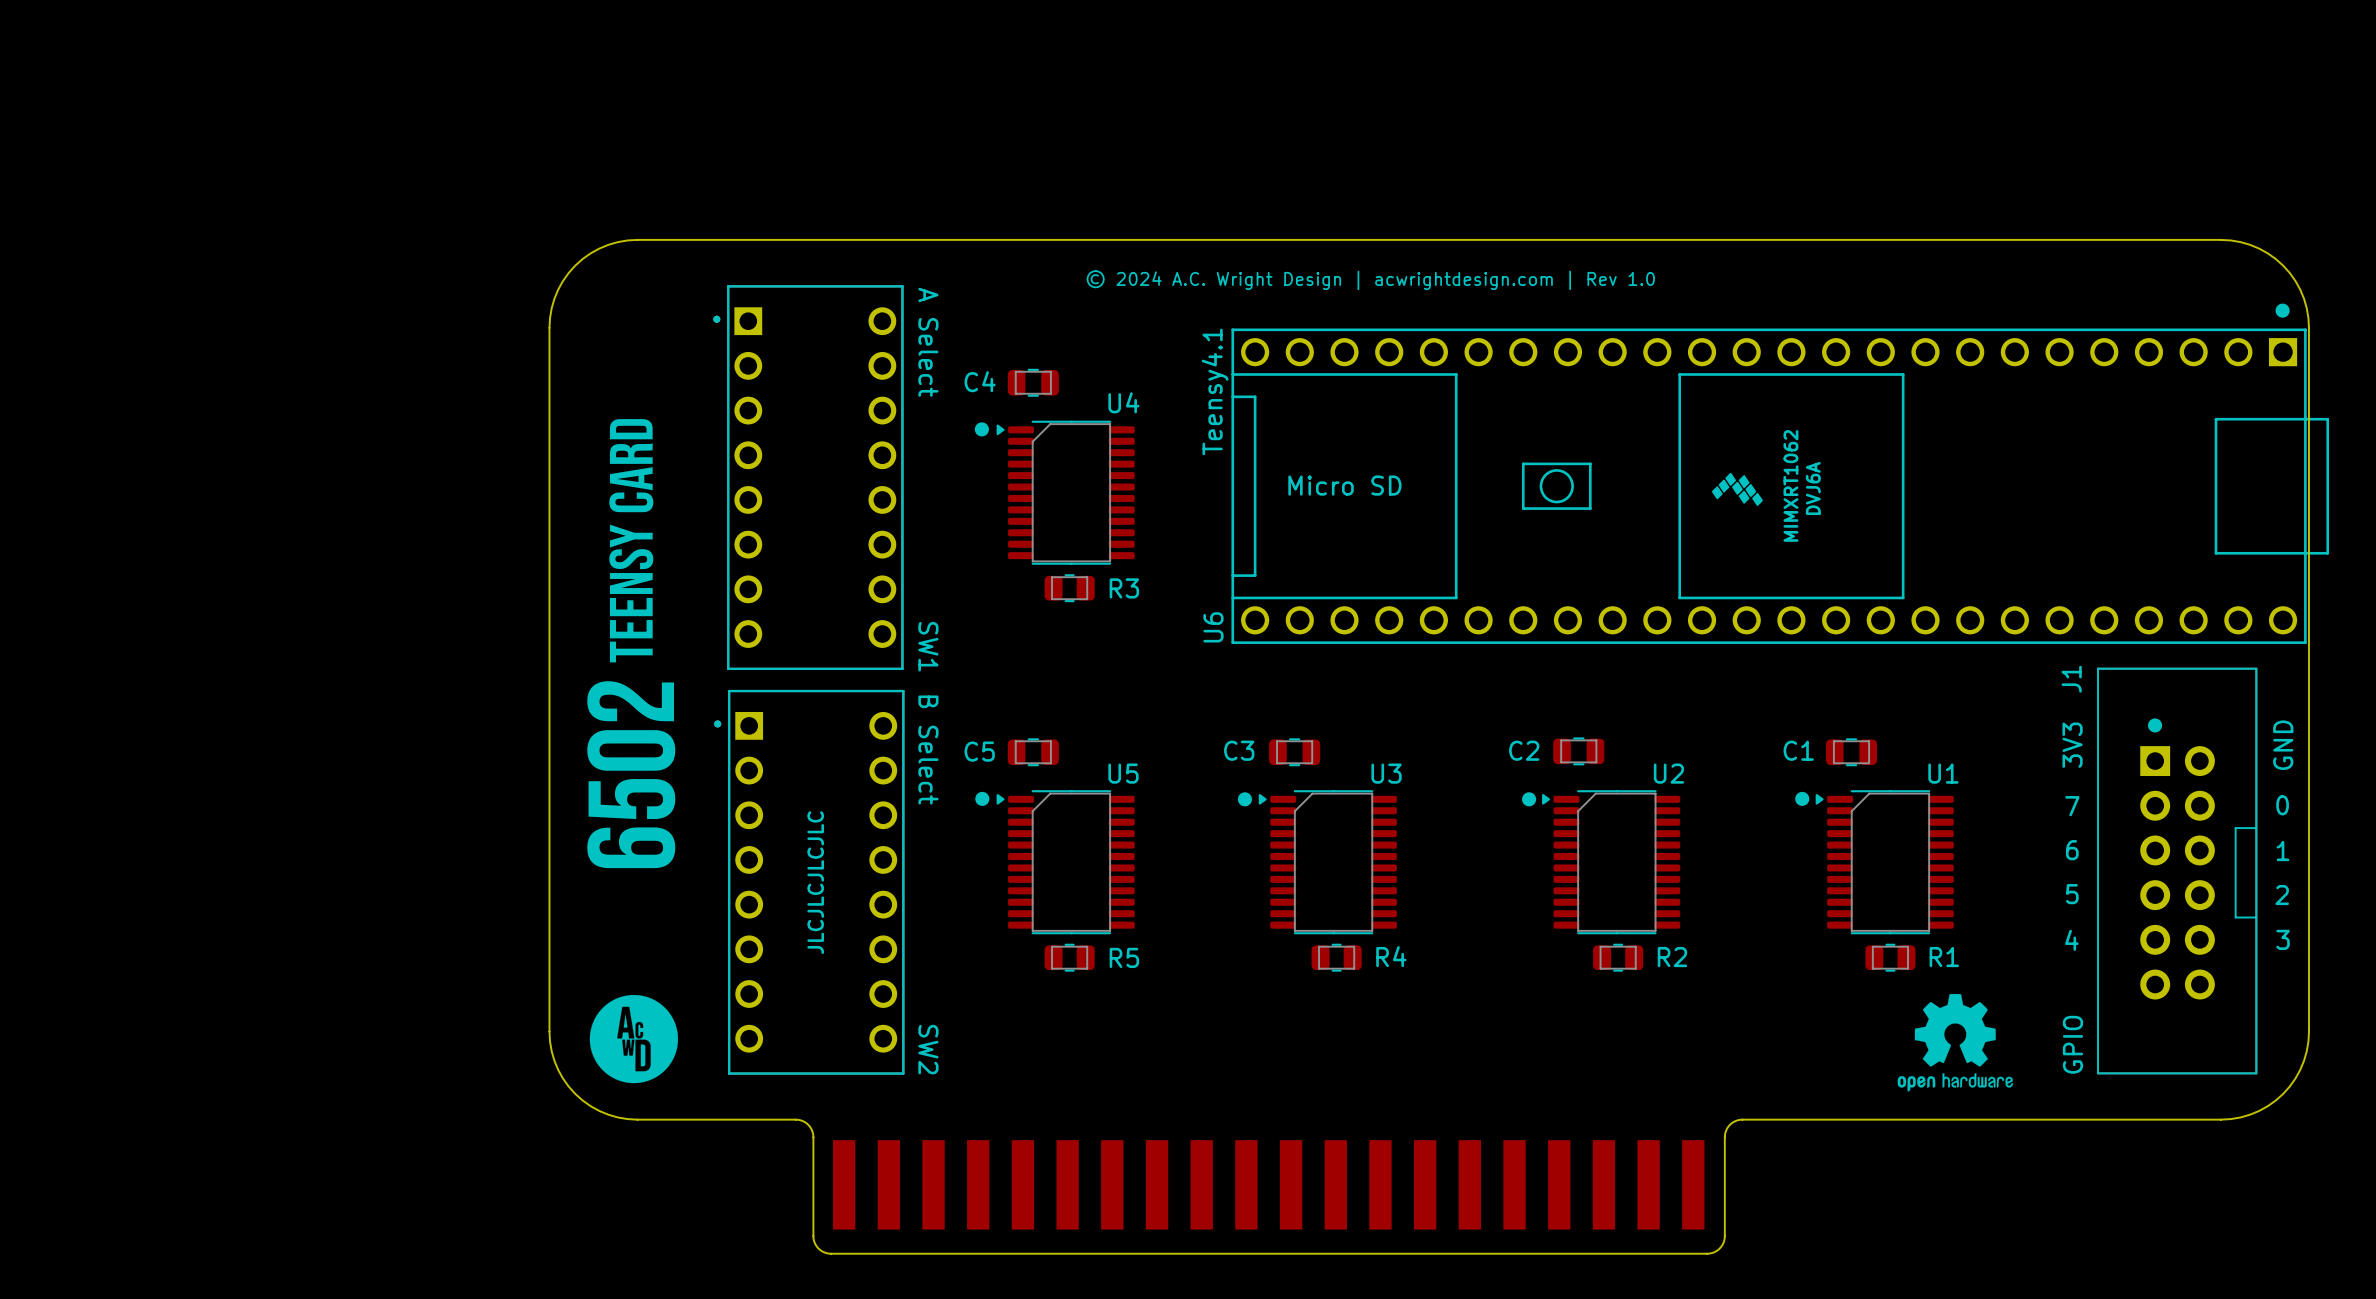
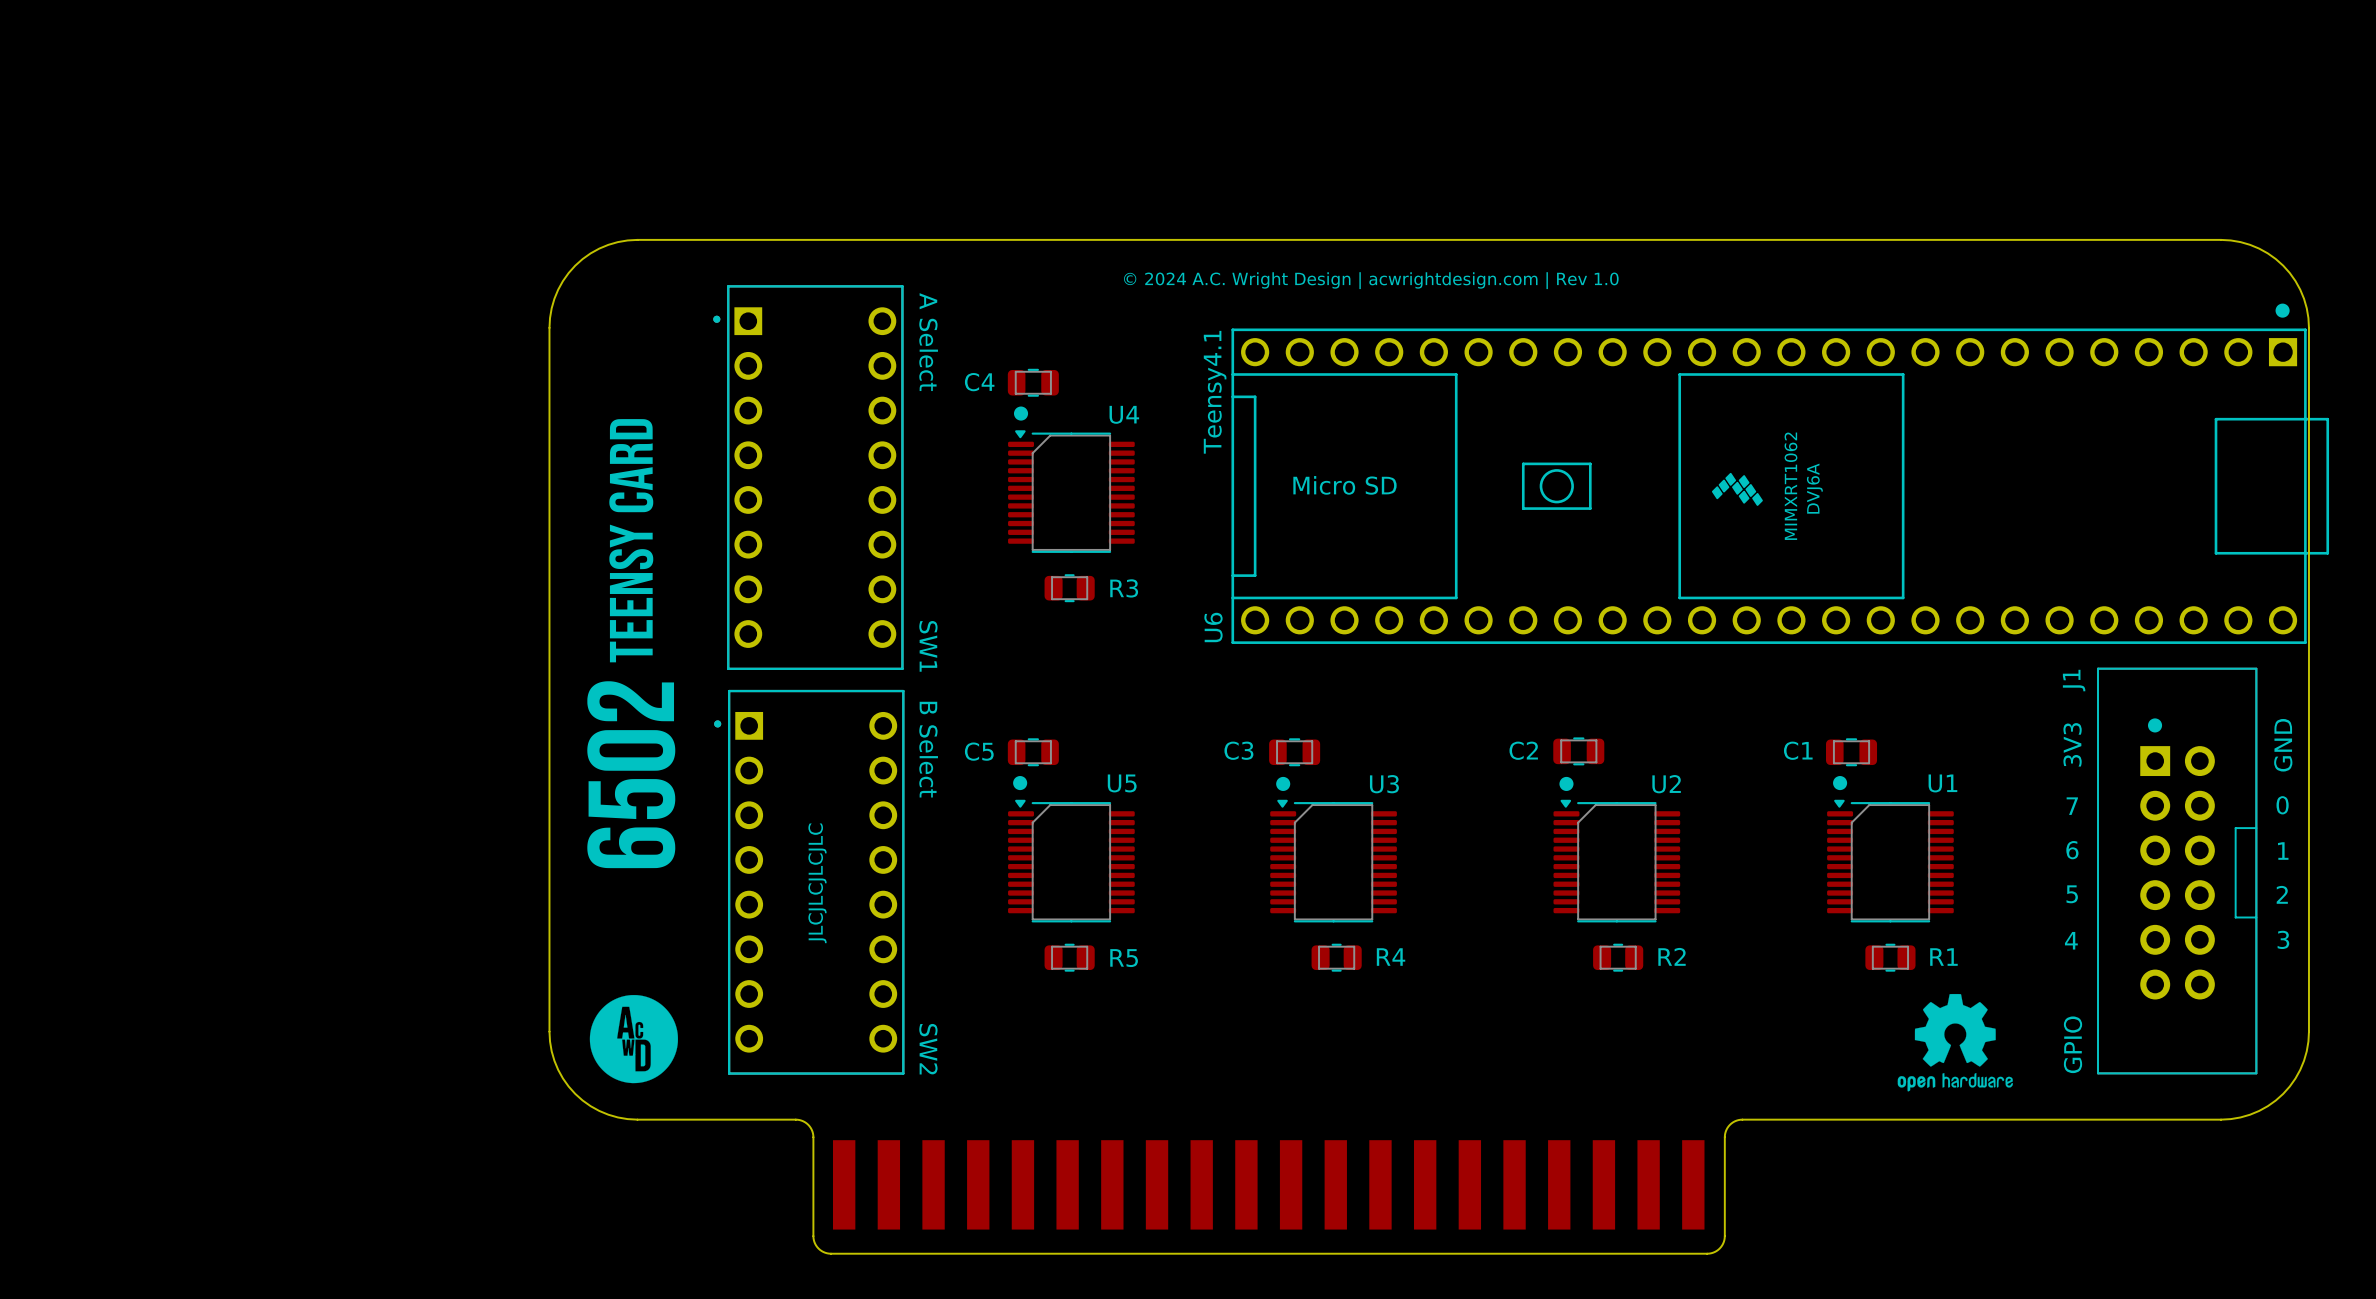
U4 footprint: [996, 420, 1135, 565] -> [1008, 430, 1135, 553]
drawing position: (981, 429) -> (1021, 413)
U5 footprint: [996, 790, 1135, 935] -> [1008, 799, 1135, 923]
U3 footprint: [1258, 790, 1397, 935] -> [1270, 799, 1397, 923]
U2 footprint: [1542, 790, 1681, 935] -> [1553, 799, 1681, 923]
U1 footprint: [1815, 790, 1954, 935] -> [1827, 799, 1954, 923]
drawing position: (982, 798) -> (1020, 783)
drawing position: (1802, 798) -> (1840, 783)
drawing position: (1244, 799) -> (1283, 783)
drawing position: (1529, 799) -> (1566, 783)

